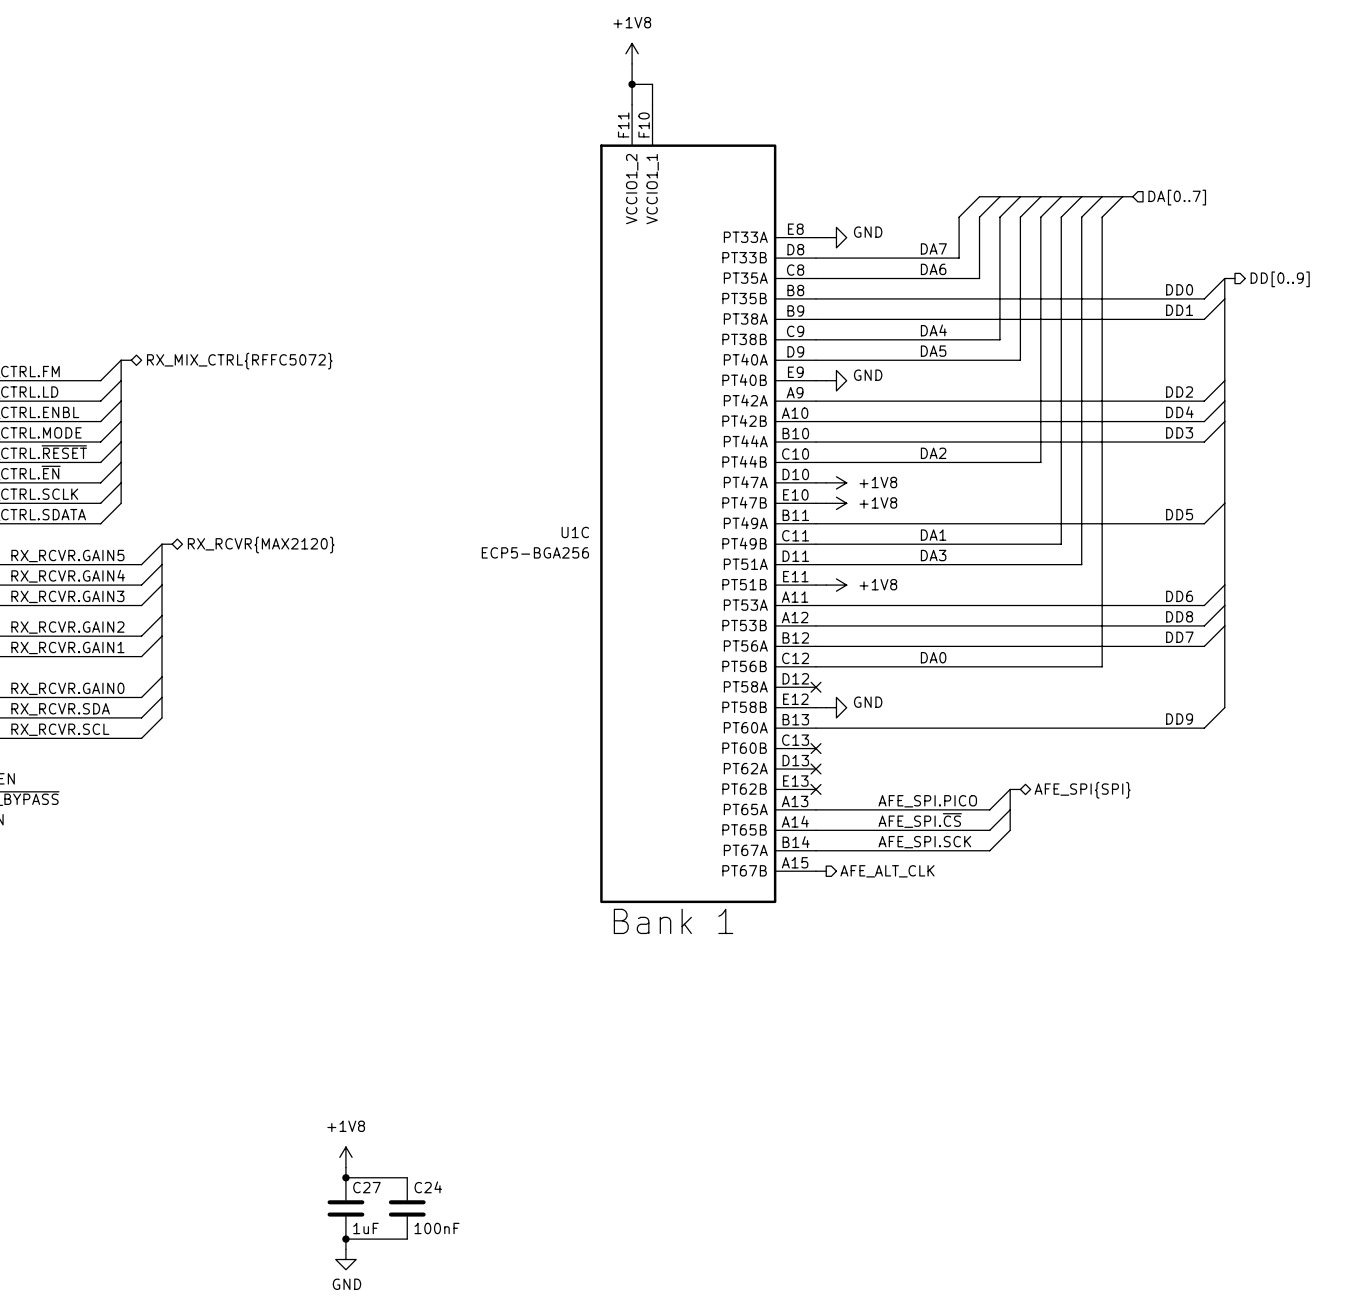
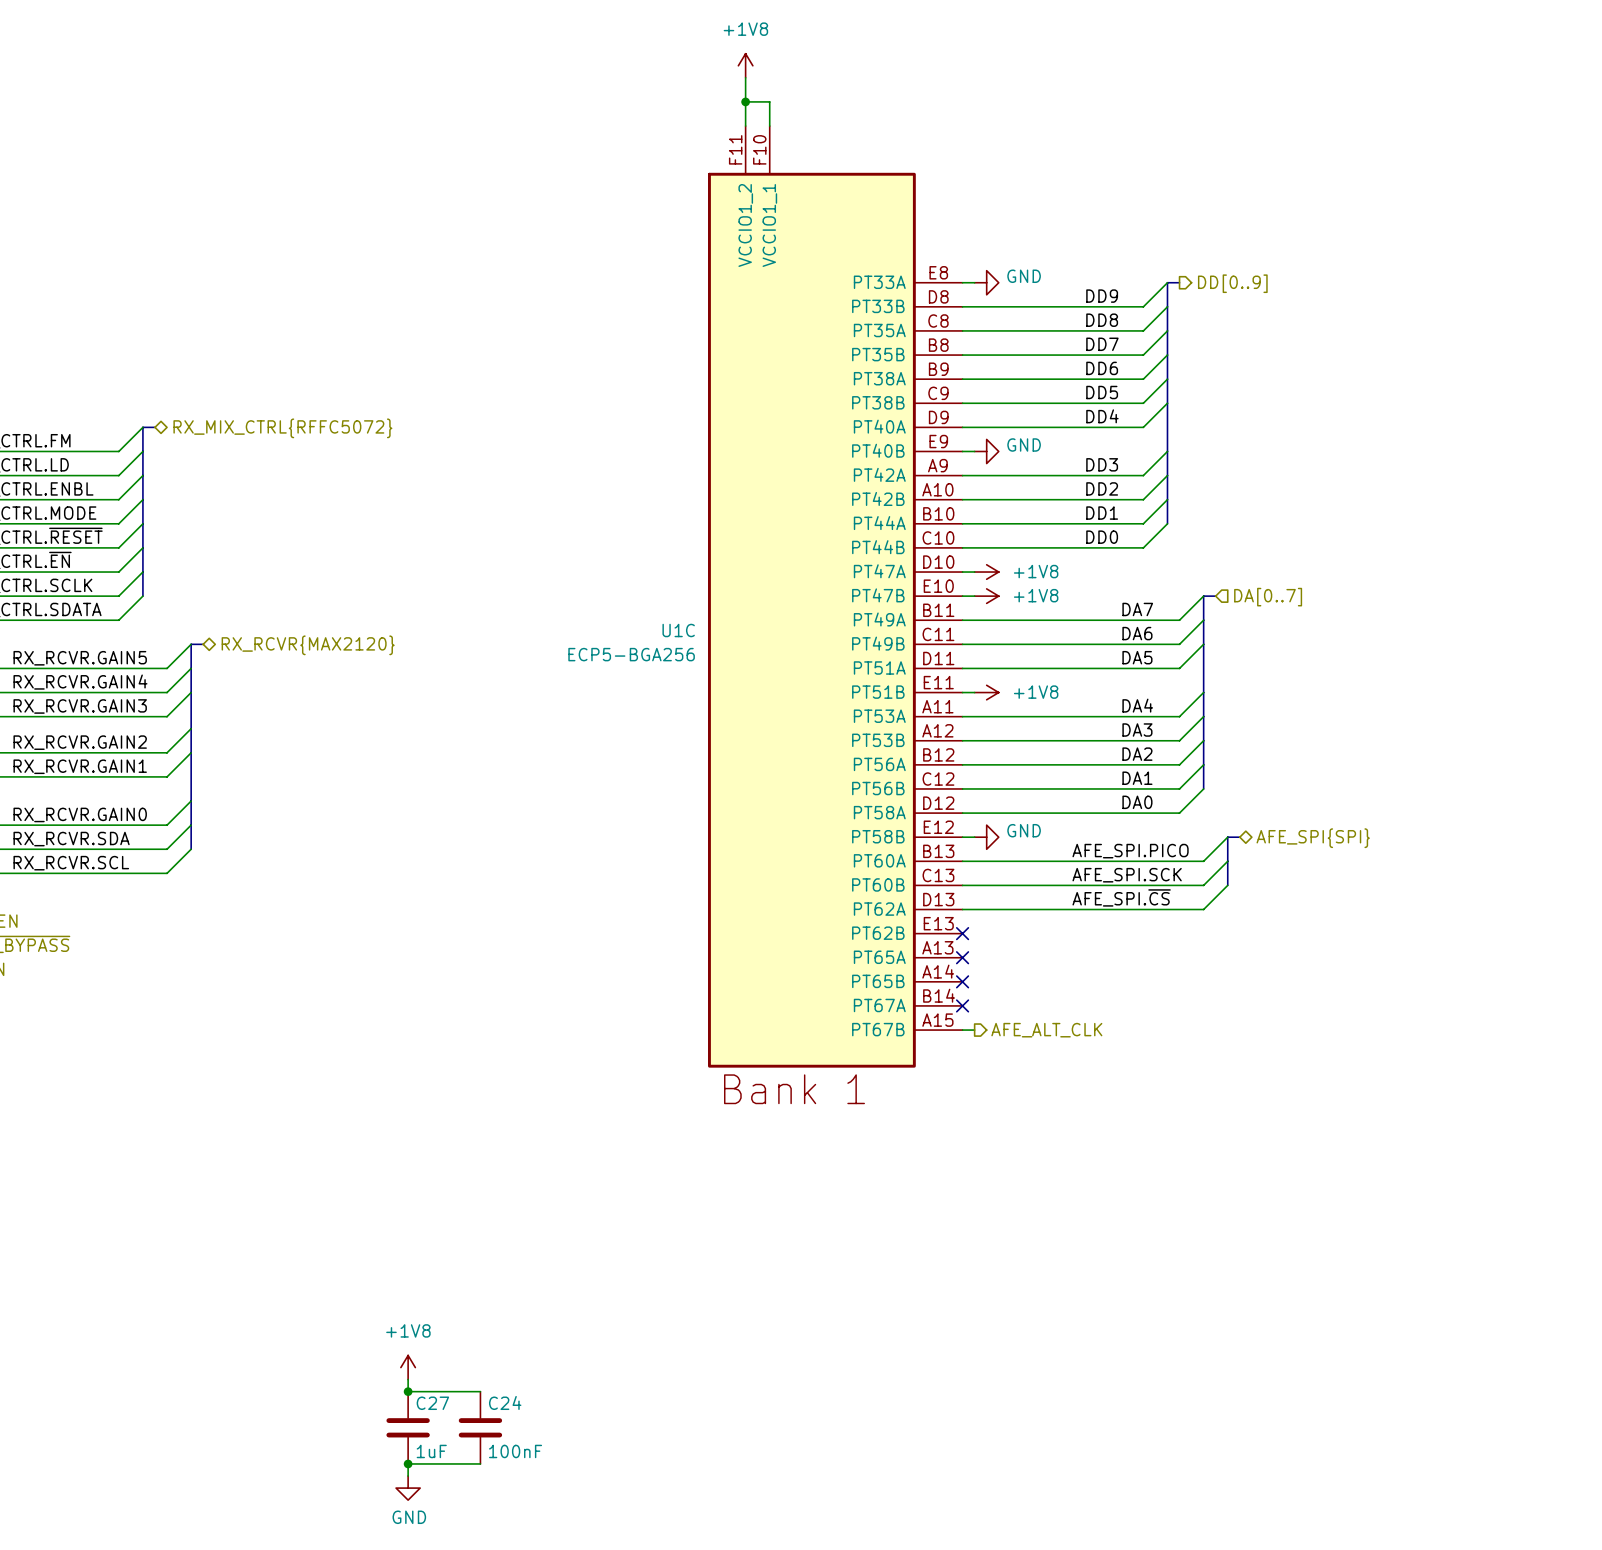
wire: (979, 196) (959, 217) (959, 258) -> (1167, 282) (1143, 306) (1131, 306)
bus: (979, 196) (1132, 196) -> none
wire: (999, 196) (979, 217) (979, 278) (969, 278) -> (1167, 306) (1143, 330)
wire: (1020, 196) (999, 217) (999, 339) (969, 339) -> (1167, 379) (1143, 403)
wire: (1040, 196) (1020, 217) (1020, 360) (969, 360) -> (1167, 403) (1143, 427)
wire: (1061, 196) (1040, 217) (1040, 462) (969, 462) -> (1167, 523) (1143, 547)
wire: (1081, 196) (1061, 217) (1061, 544) (999, 544) -> (1203, 620) (1179, 644)
wire: (1102, 196) (1081, 217) (1081, 564) (999, 564) -> (1203, 644) (1179, 668)
wire: (1122, 196) (1102, 217) (1102, 666) (999, 666) -> (1203, 764) (1179, 788)
hierarchical label: DA[0..7] (1177, 197) -> none
bus: none -> (1179, 282) (1167, 282) (1167, 523)
hierarchical label: none -> DD[0..9] (1232, 283)
label: DA7 (933, 248) -> DD9 (1102, 296)
label: DA6 (933, 269) -> DD8 (1102, 320)
wire: (1224, 278) (1204, 298) (969, 298) -> (1167, 330) (1143, 355)
bus: (1234, 278) (1224, 278) (1224, 707) -> none
hierarchical label: DD[0..9] (1280, 279) -> none
label: none -> DD7 (1102, 344)
label: DD0 (1179, 289) -> none
wire: (1224, 298) (1204, 319) (969, 319) -> (1167, 355) (1143, 379)
label: none -> DD6 (1102, 368)
label: DD1 (1179, 310) -> none
label: DA4 (933, 330) -> DD5 (1102, 392)
label: DA5 (933, 351) -> DD4 (1102, 416)
wire: (1224, 380) (1204, 401) (969, 401) -> (1167, 451) (1143, 475)
label: none -> DD3 (1102, 464)
label: DD2 (1179, 392) -> none
wire: (1224, 401) (1204, 421) (969, 421) -> (1167, 475) (1143, 499)
label: none -> DD2 (1102, 488)
label: DD4 (1179, 412) -> none
wire: (1224, 421) (1204, 442) (969, 442) -> (1167, 499) (1143, 523)
label: none -> DD1 (1102, 513)
label: DD3 (1179, 432) -> none
label: DA2 (933, 453) -> DD0 (1102, 537)
bus: none -> (1215, 596) (1203, 596) (1203, 788)
wire: (1224, 503) (1204, 523) (999, 523) -> (1203, 596) (1179, 620)
hierarchical label: none -> DA[0..7] (1268, 597)
label: none -> DA7 (1137, 609)
label: DD5 (1179, 514) -> none
label position: DA1 (933, 535) -> DA1 (1137, 778)
label: none -> DA6 (1137, 633)
label position: DA3 (933, 555) -> DA3 (1137, 730)
label: none -> DA5 (1137, 657)
wire: (1224, 585) (1204, 605) (999, 605) -> (1203, 692) (1179, 716)
label: none -> DA4 (1137, 705)
label: DD6 (1179, 596) -> none
wire: (1224, 605) (1204, 625) (999, 625) -> (1203, 716) (1179, 740)
label: DD8 (1179, 616) -> none
wire: (1224, 625) (1204, 646) (999, 646) -> (1203, 740) (1179, 764)
label: none -> DA2 (1137, 754)
label: DD7 (1179, 637) -> none
label position: DA0 (933, 657) -> DA0 (1137, 802)
wire: none -> (1203, 788) (1179, 813) (962, 813)
no-connect mark: (816, 687) -> none
wire: (1224, 707) (1204, 728) (1020, 728) -> (1227, 837) (1203, 861)
label: DD9 (1179, 719) -> none
wire: none -> (1227, 861) (1203, 885) (962, 885)
no-connect mark: (816, 748) -> none
wire: none -> (1227, 885) (1203, 909) (962, 909)
no-connect mark: (816, 769) -> none
wire: (1010, 789) (989, 809) (816, 809) -> none
bus: (1020, 789) (1010, 789) (1010, 830) -> (1239, 837) (1227, 837) (1227, 885)
hierarchical label position: AFE_SPI{SPI} (1082, 790) -> AFE_SPI{SPI} (1313, 838)
label position: AFE_SPI.PICO (927, 801) -> AFE_SPI.PICO (1130, 851)
no-connect mark: none -> (962, 957)
wire: (1010, 809) (989, 830) (816, 830) -> none
label position: AFE_SPI.~{CS} (920, 820) -> AFE_SPI.~{CS} (1121, 897)
no-connect mark: none -> (962, 981)
wire: (1010, 830) (989, 850) (816, 850) -> none
label position: AFE_SPI.SCK (924, 842) -> AFE_SPI.SCK (1127, 875)
no-connect mark: none -> (962, 1005)

